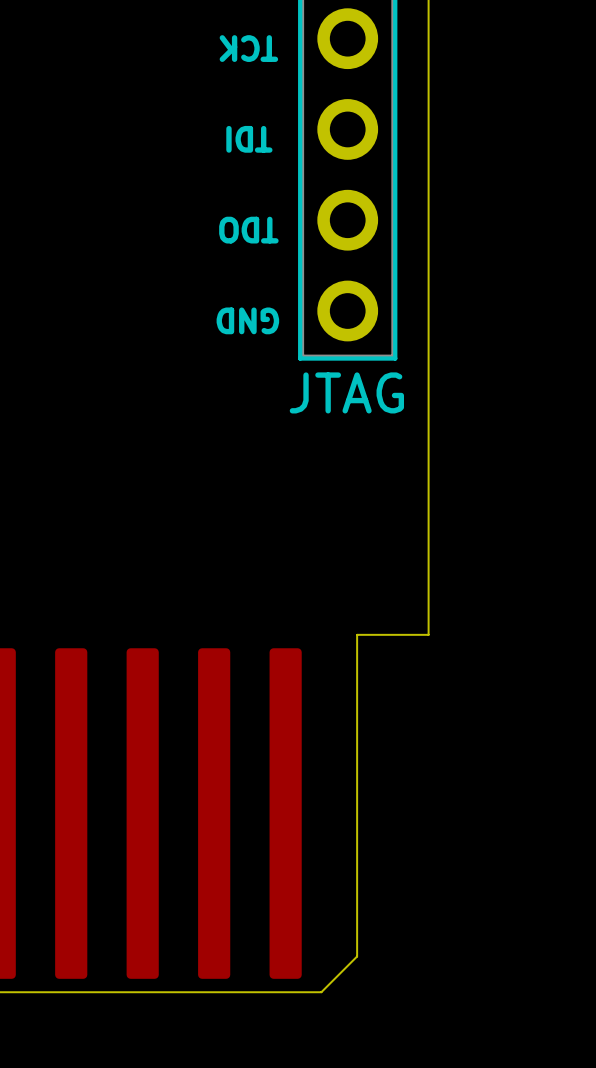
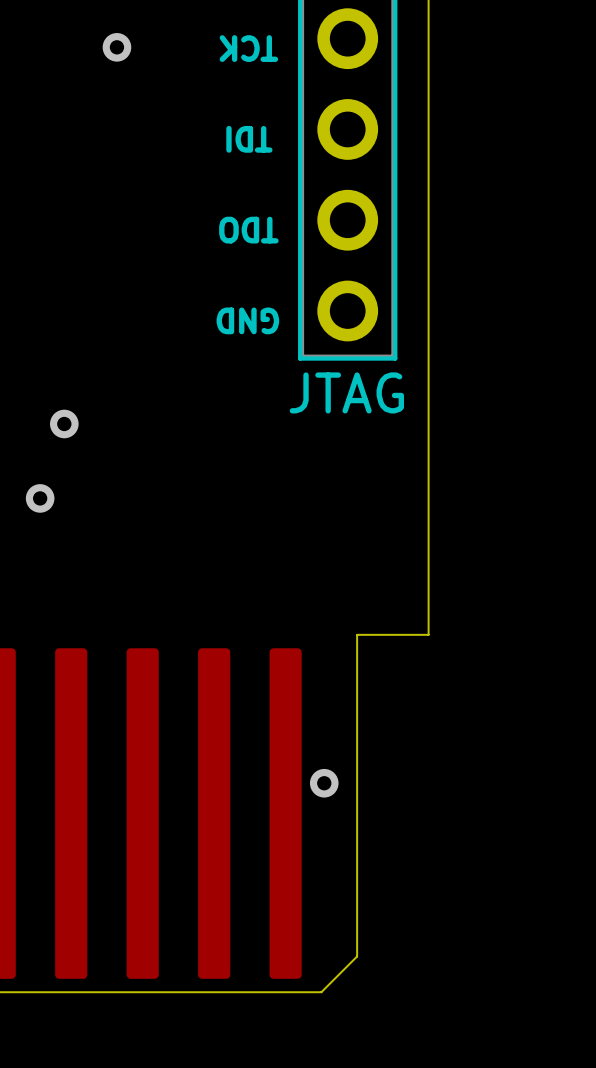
via: none -> (116, 47)
via: none -> (64, 423)
via: none -> (40, 498)
via: none -> (324, 783)

